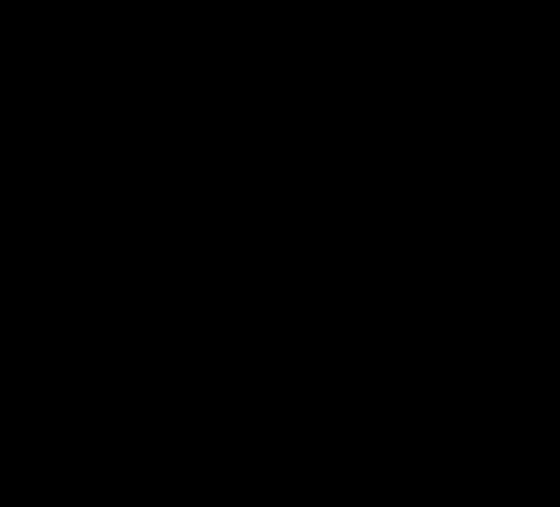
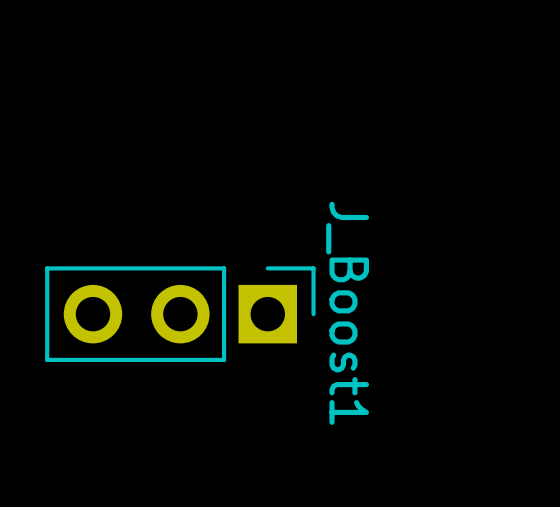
J_Boost1: none -> (180, 314)

